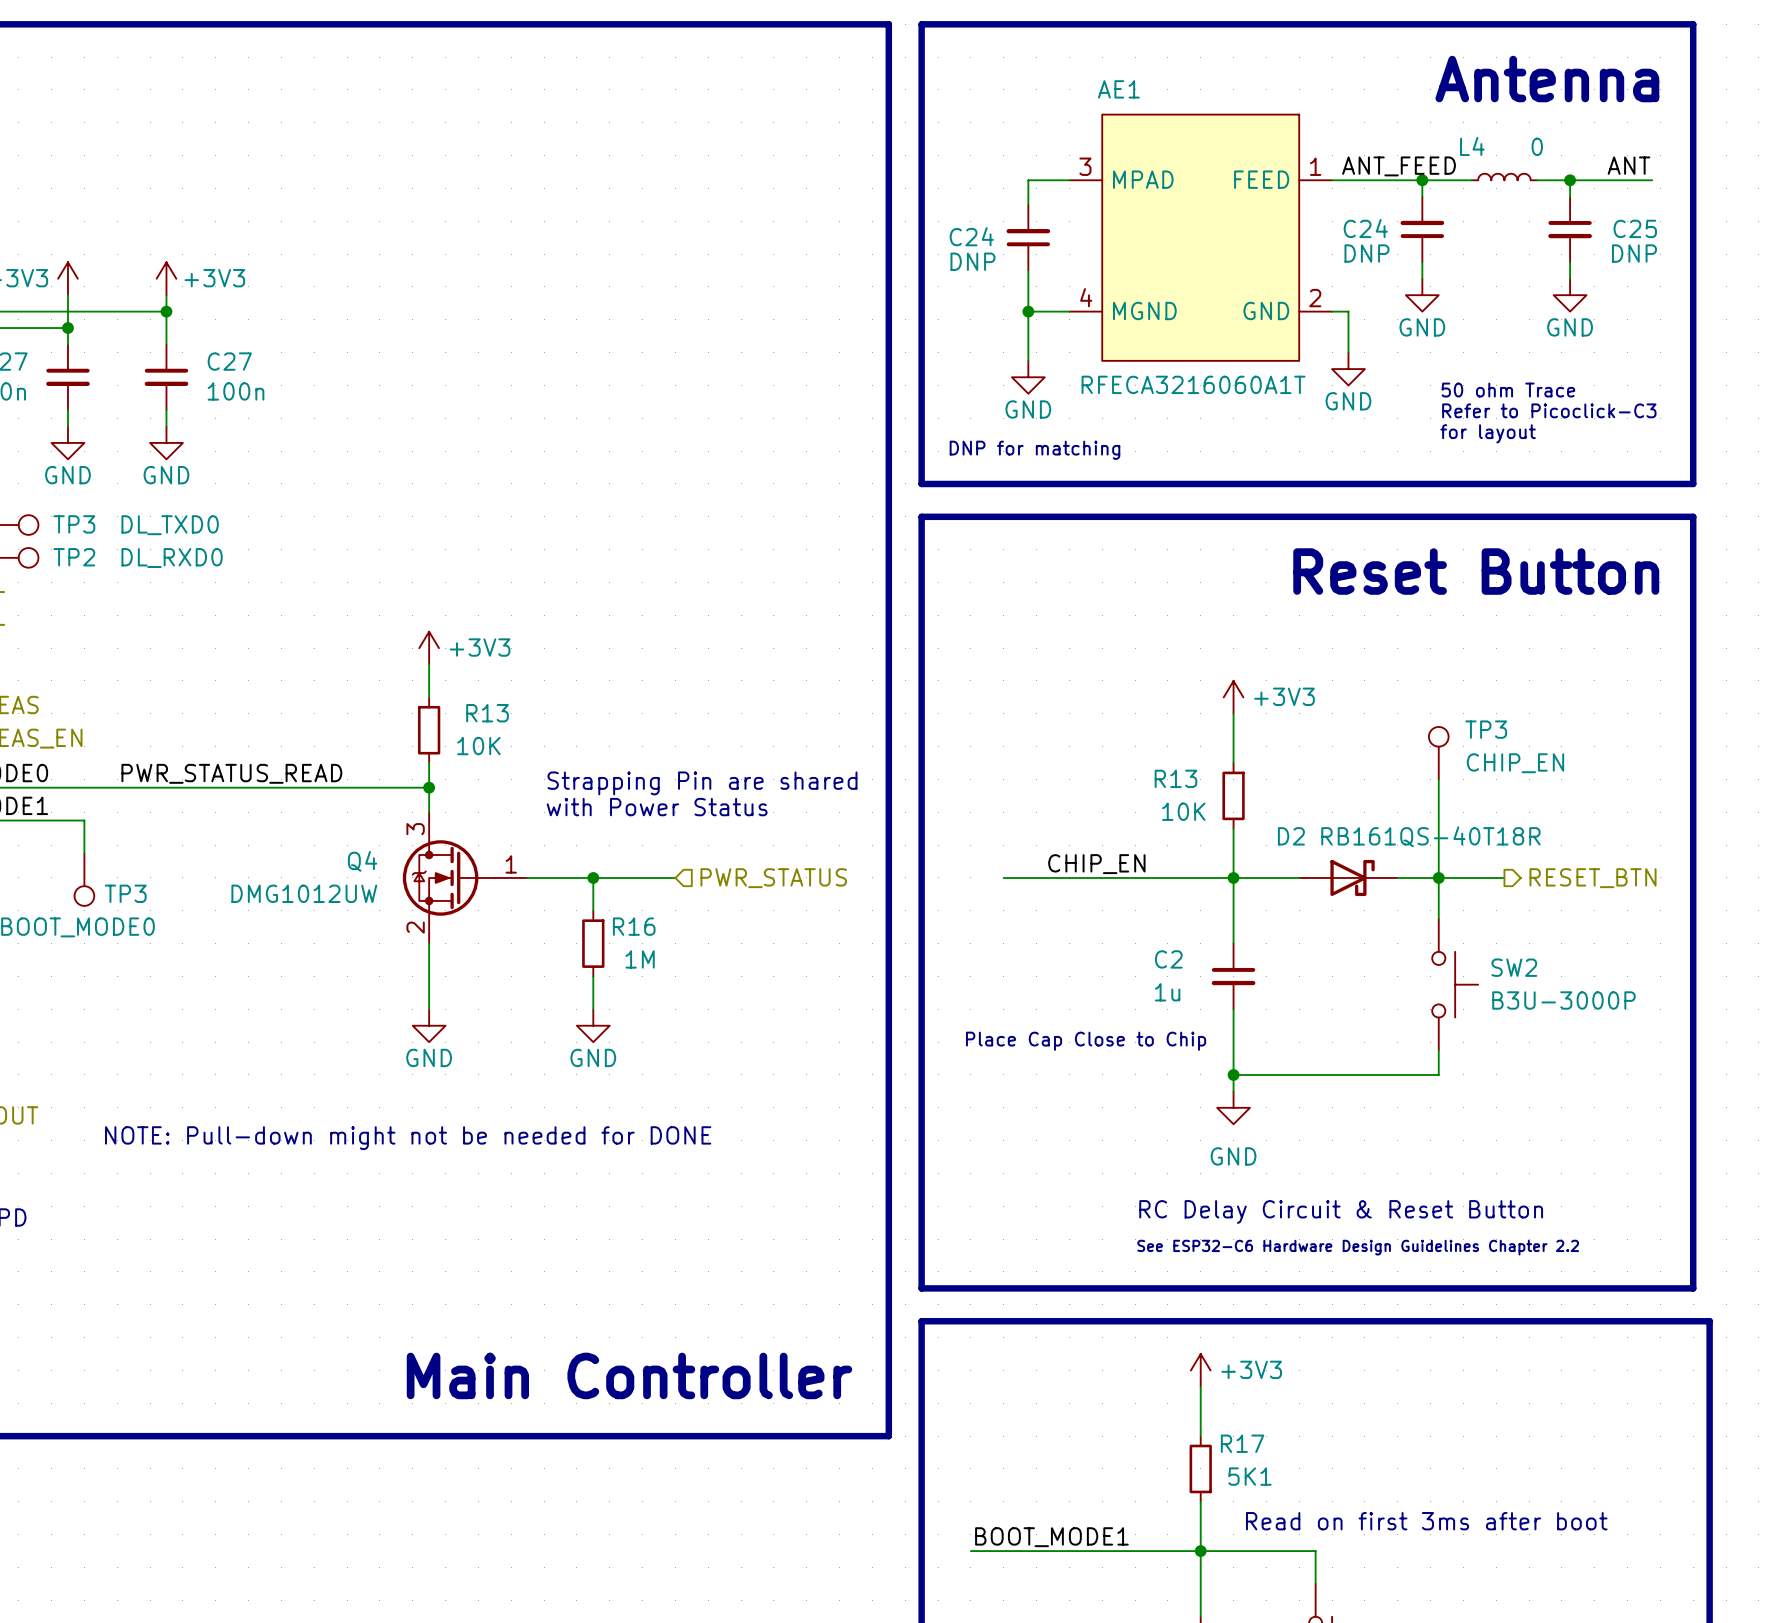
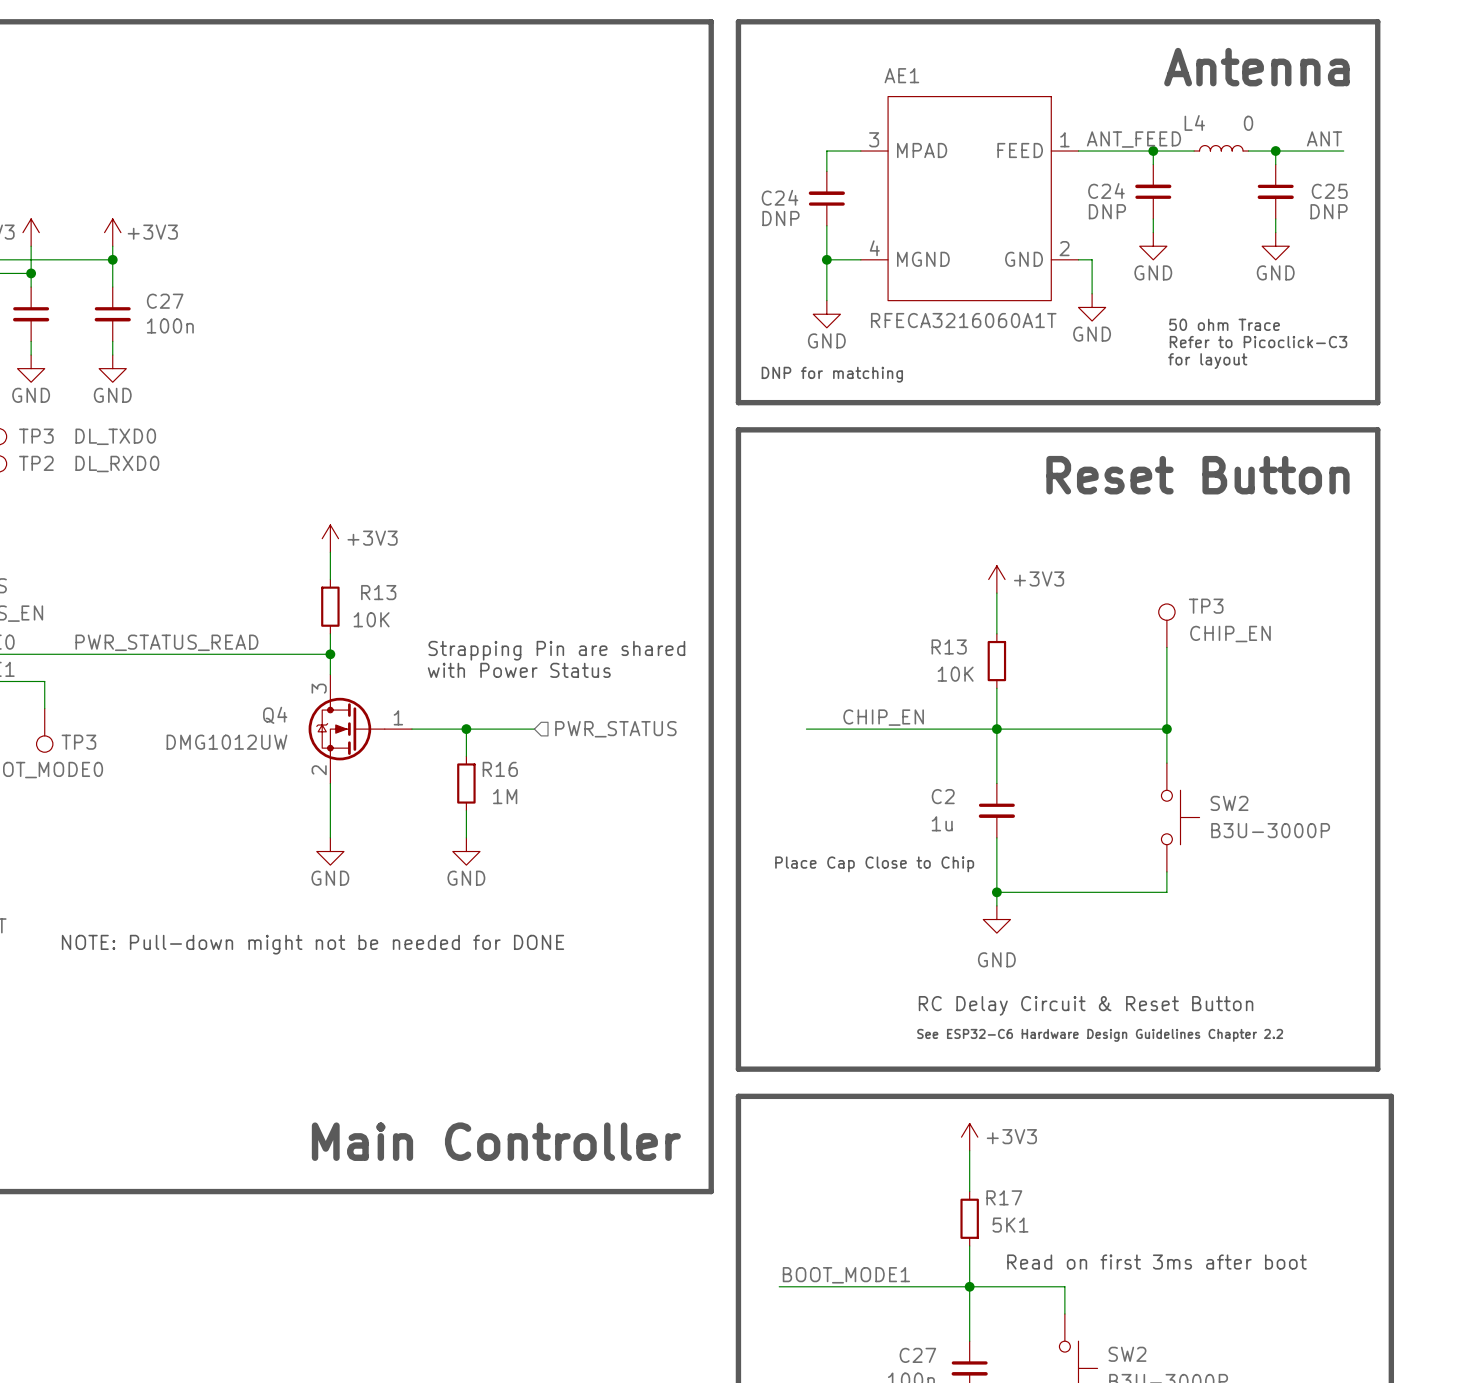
D2: RB161QS-40T18R (1348, 877) -> none
wire: (1438, 877) (1504, 877) -> none
hierarchical label: RESET_BTN (1593, 878) -> none

